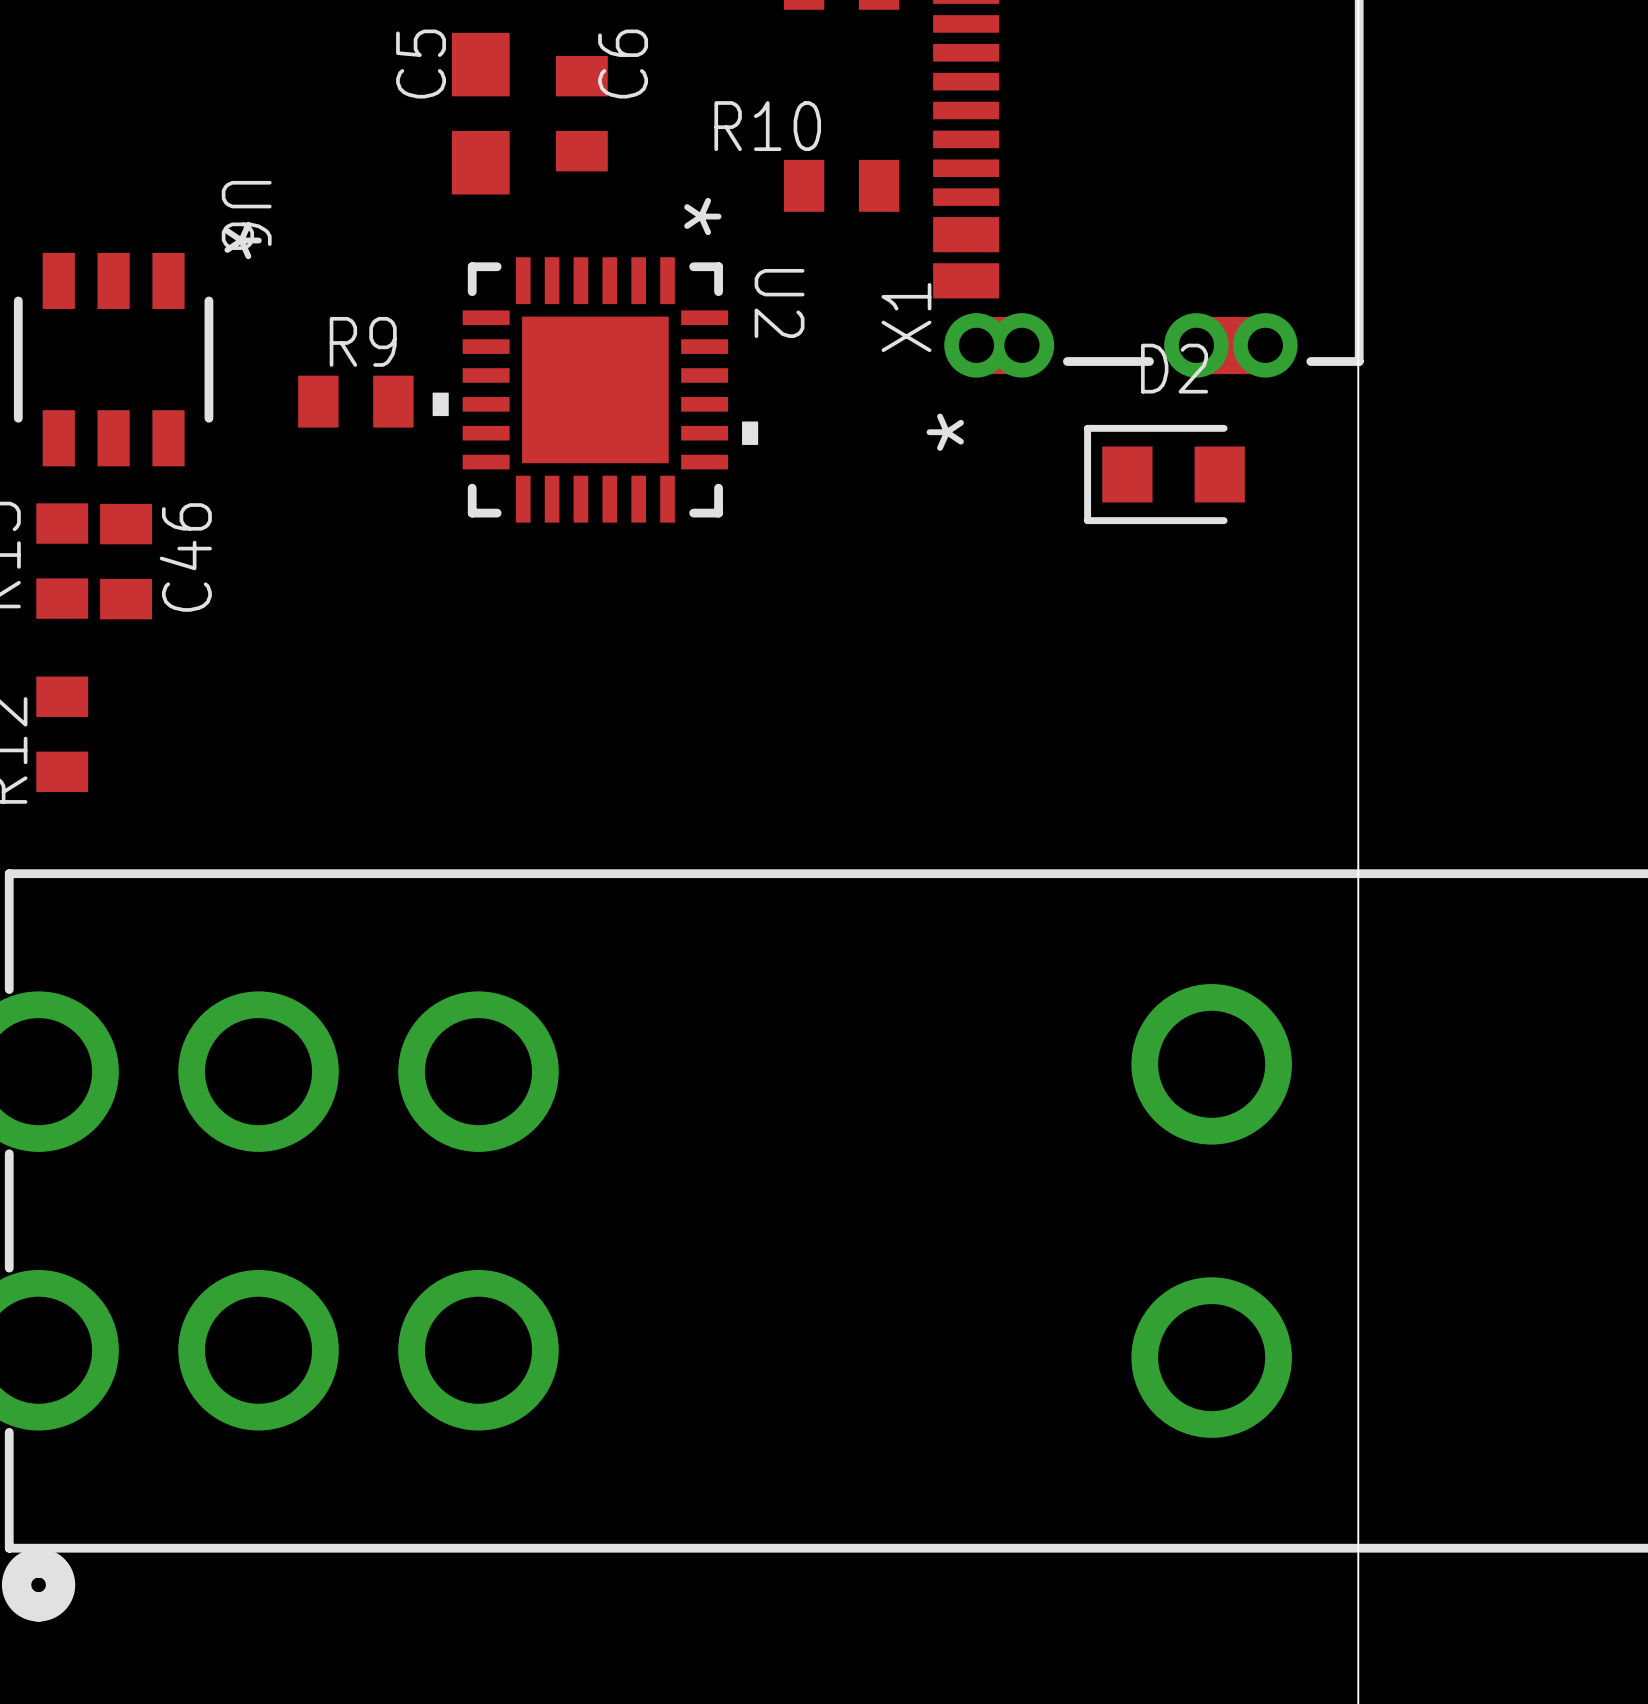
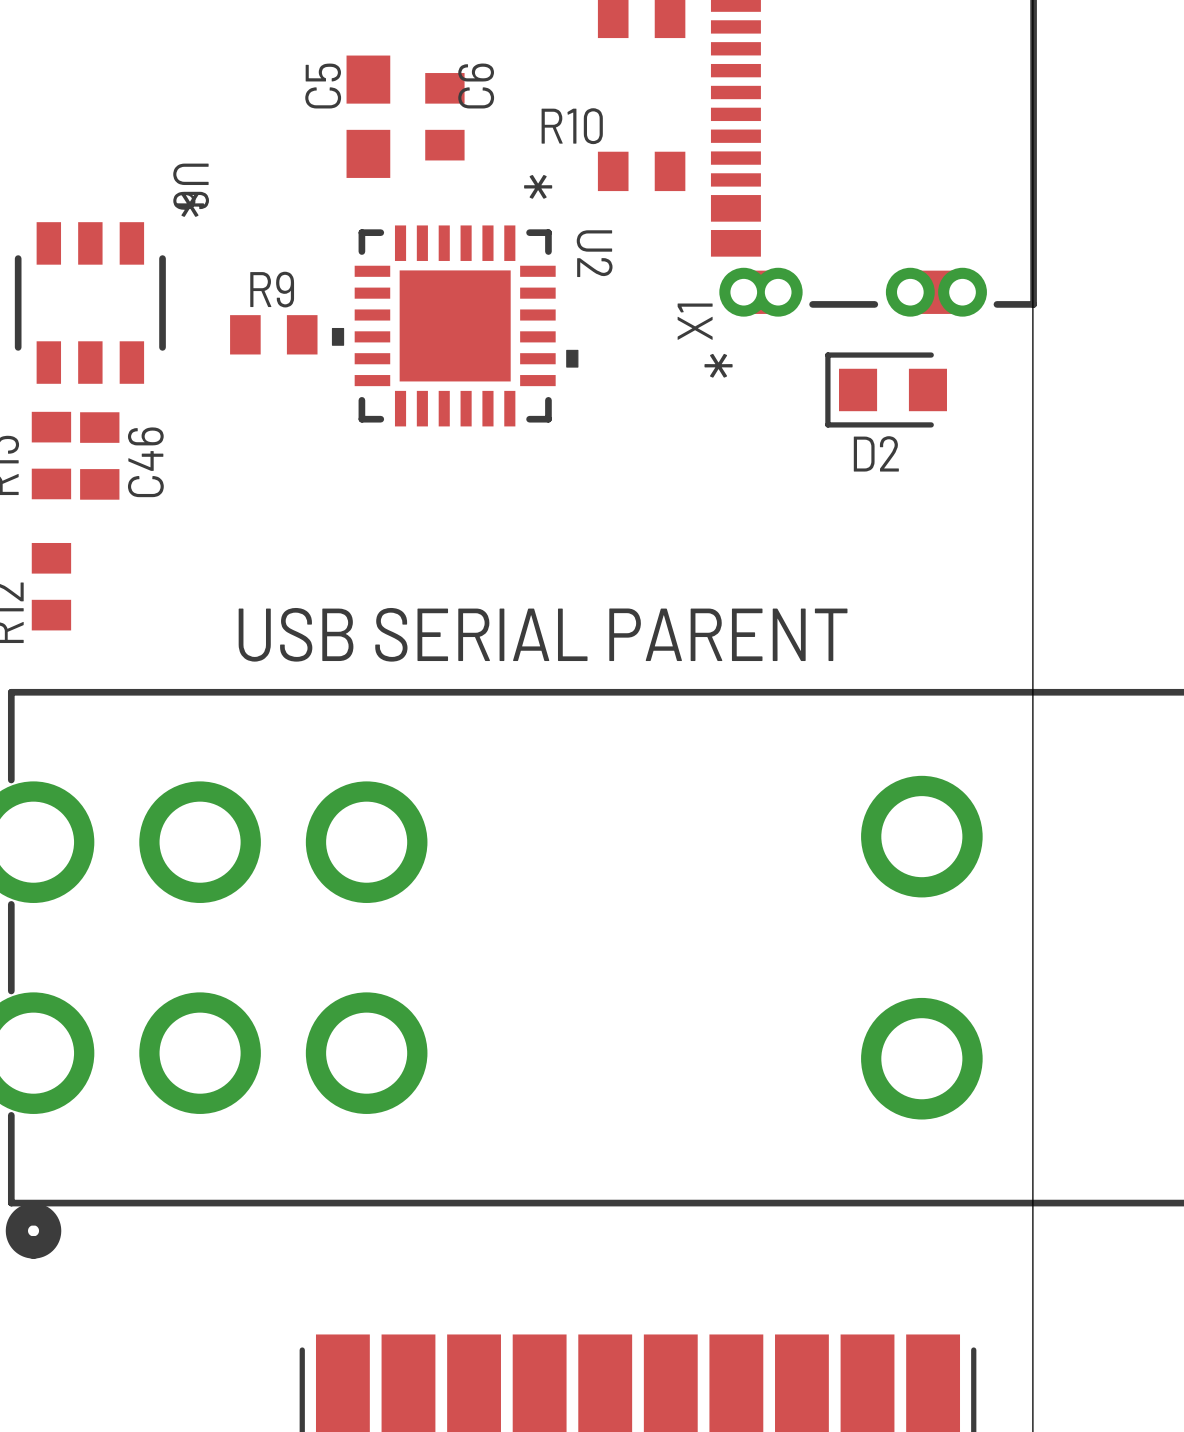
X1 name position: X1 (906, 317) -> X1 (695, 321)
D2 name position: D2 (1174, 368) -> D2 (876, 453)
text: none -> USB SERIAL PARENT (543, 634)

